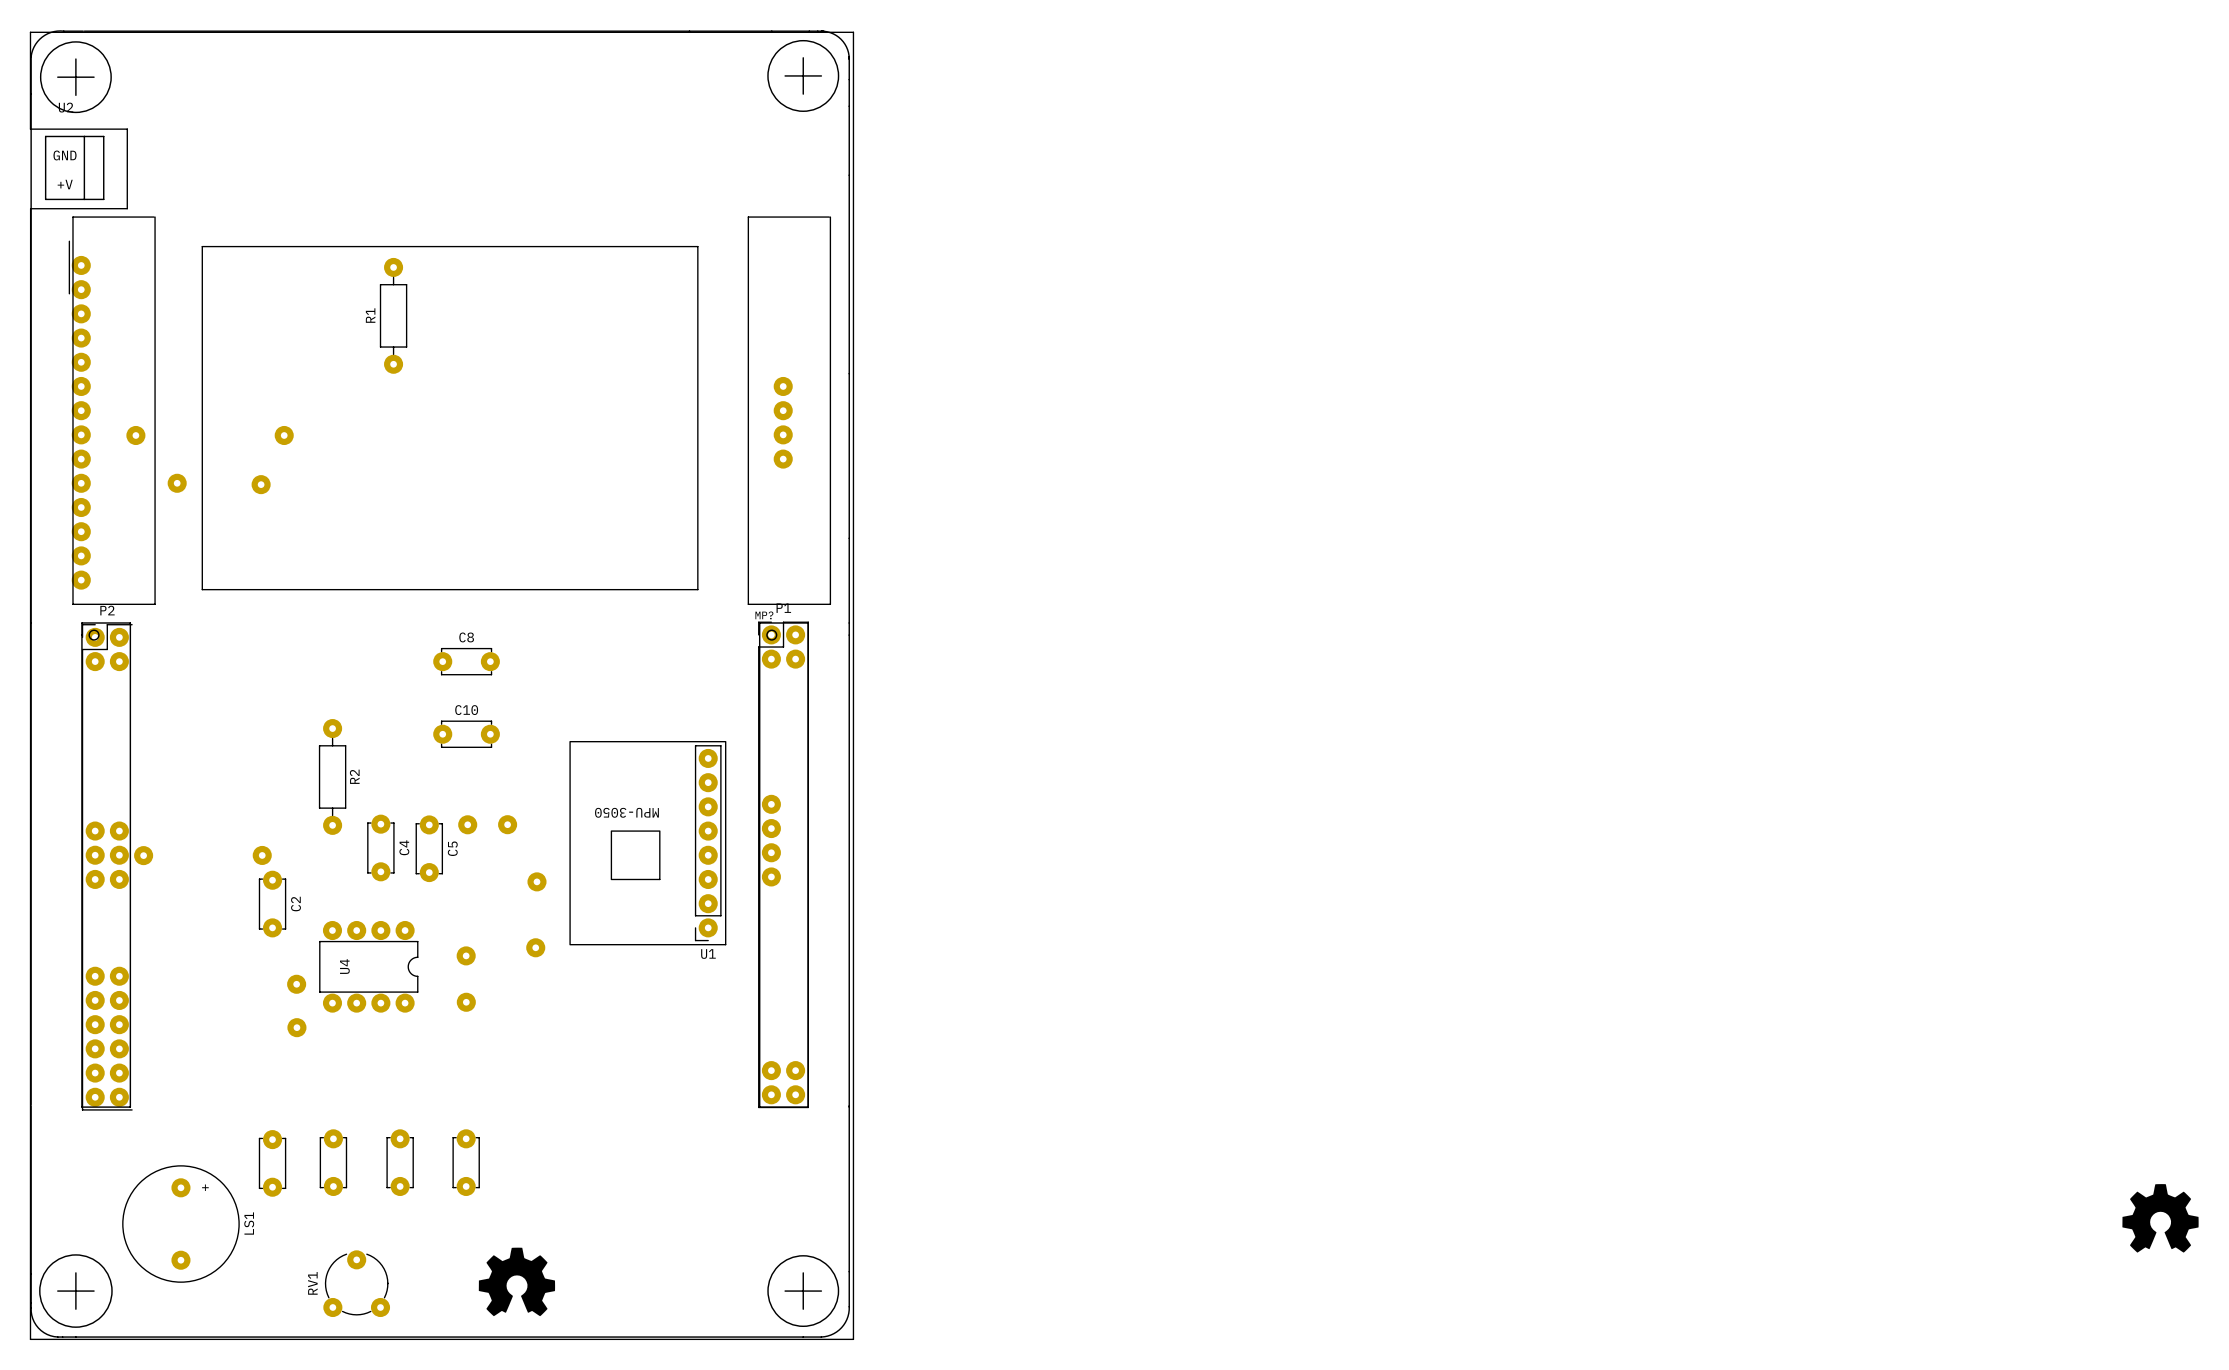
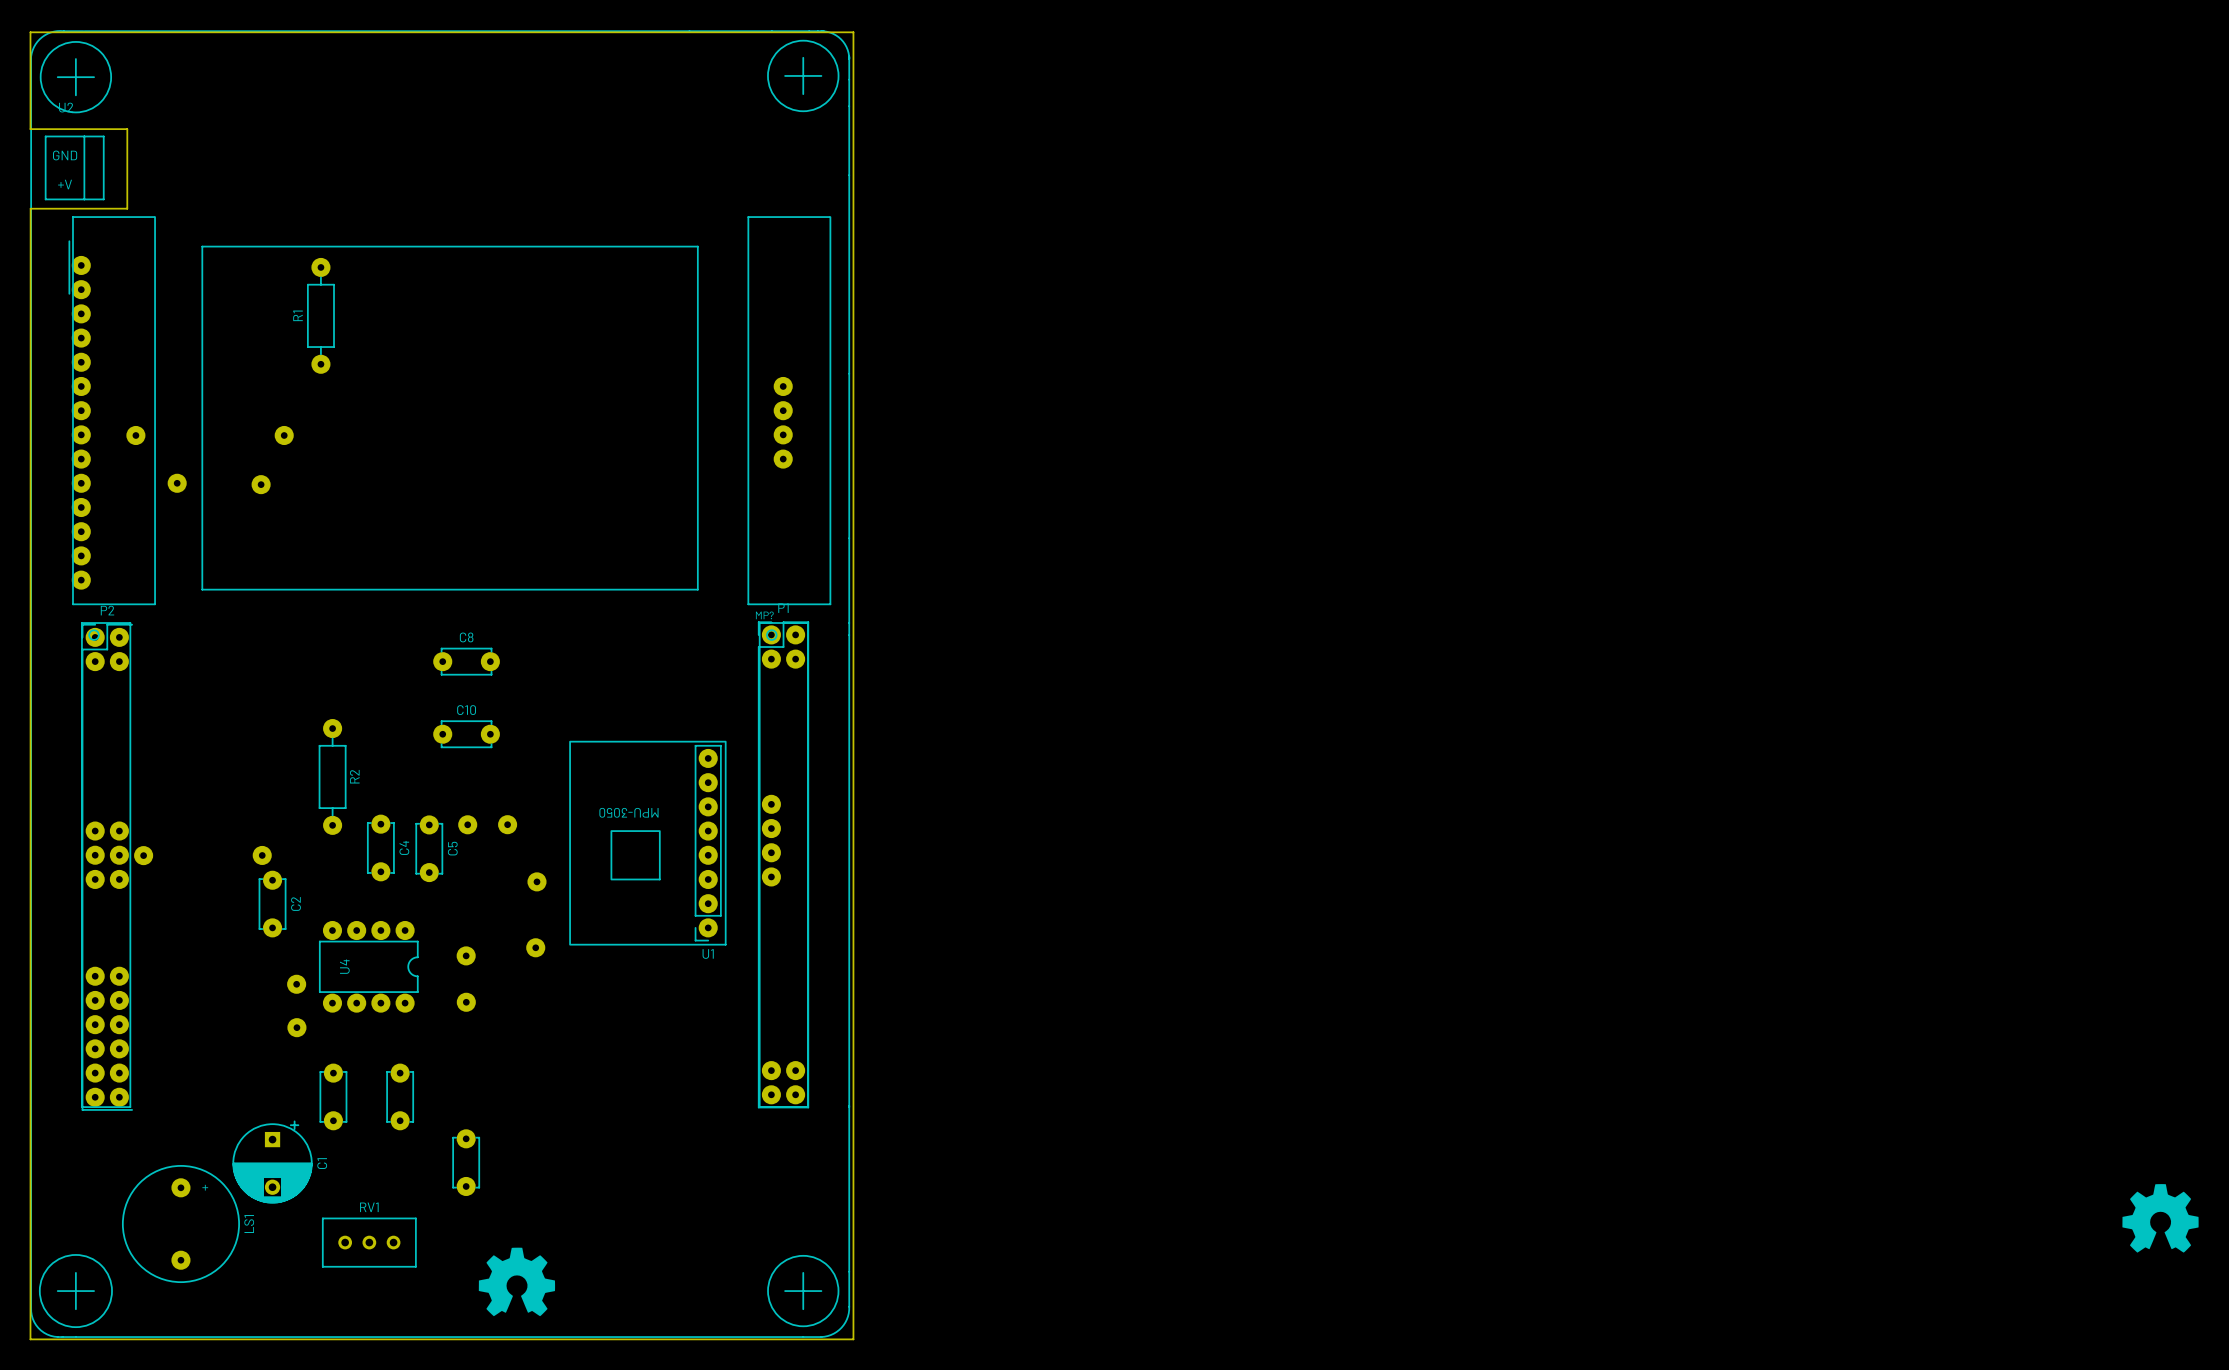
R1 position: (393, 315) -> (320, 315)
part: none -> (333, 1096)
part: none -> (400, 1096)
C1: none -> (272, 1162)
part: (333, 1162) -> none
part: (400, 1162) -> none
part: (272, 1163) -> none
RV1 footprint: [323, 1250, 391, 1318] -> [322, 1217, 417, 1268]
RV1 name position: RV1 (312, 1283) -> RV1 (369, 1207)

